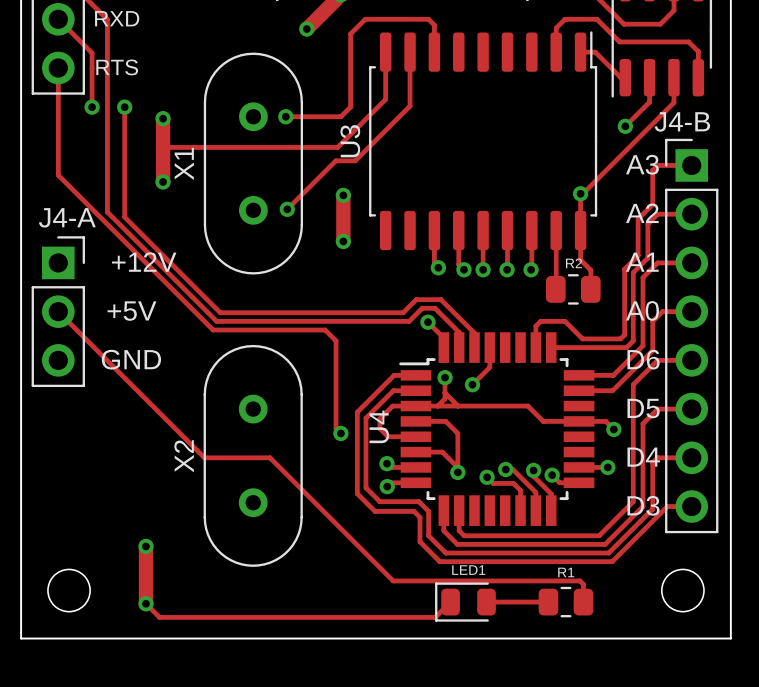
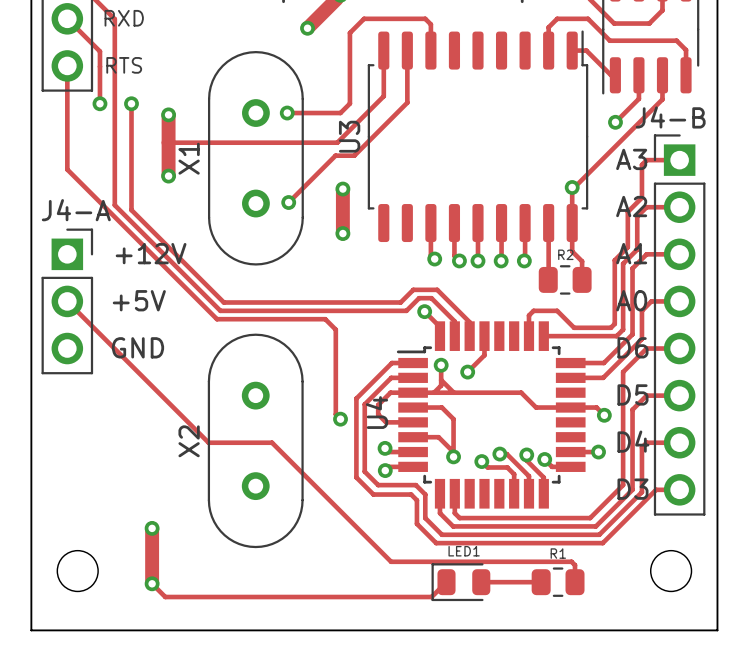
board edge: (21, 638) (730, 638) -> (31, 617) (31, 630) (717, 630) (717, 617)

